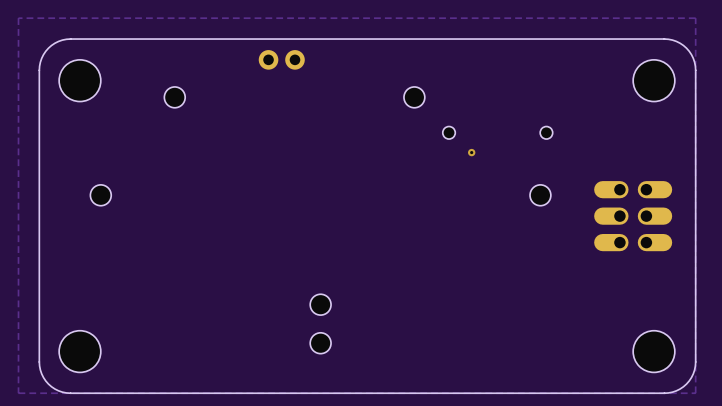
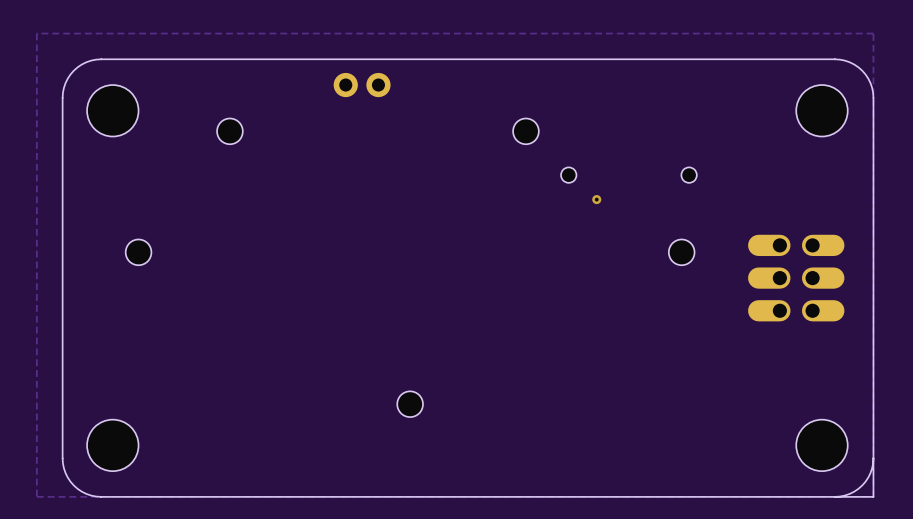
hole: (320, 304) -> none
hole: none -> (410, 404)
hole: (320, 343) -> none
board edge: none -> (873, 458) (873, 496) (834, 496)

